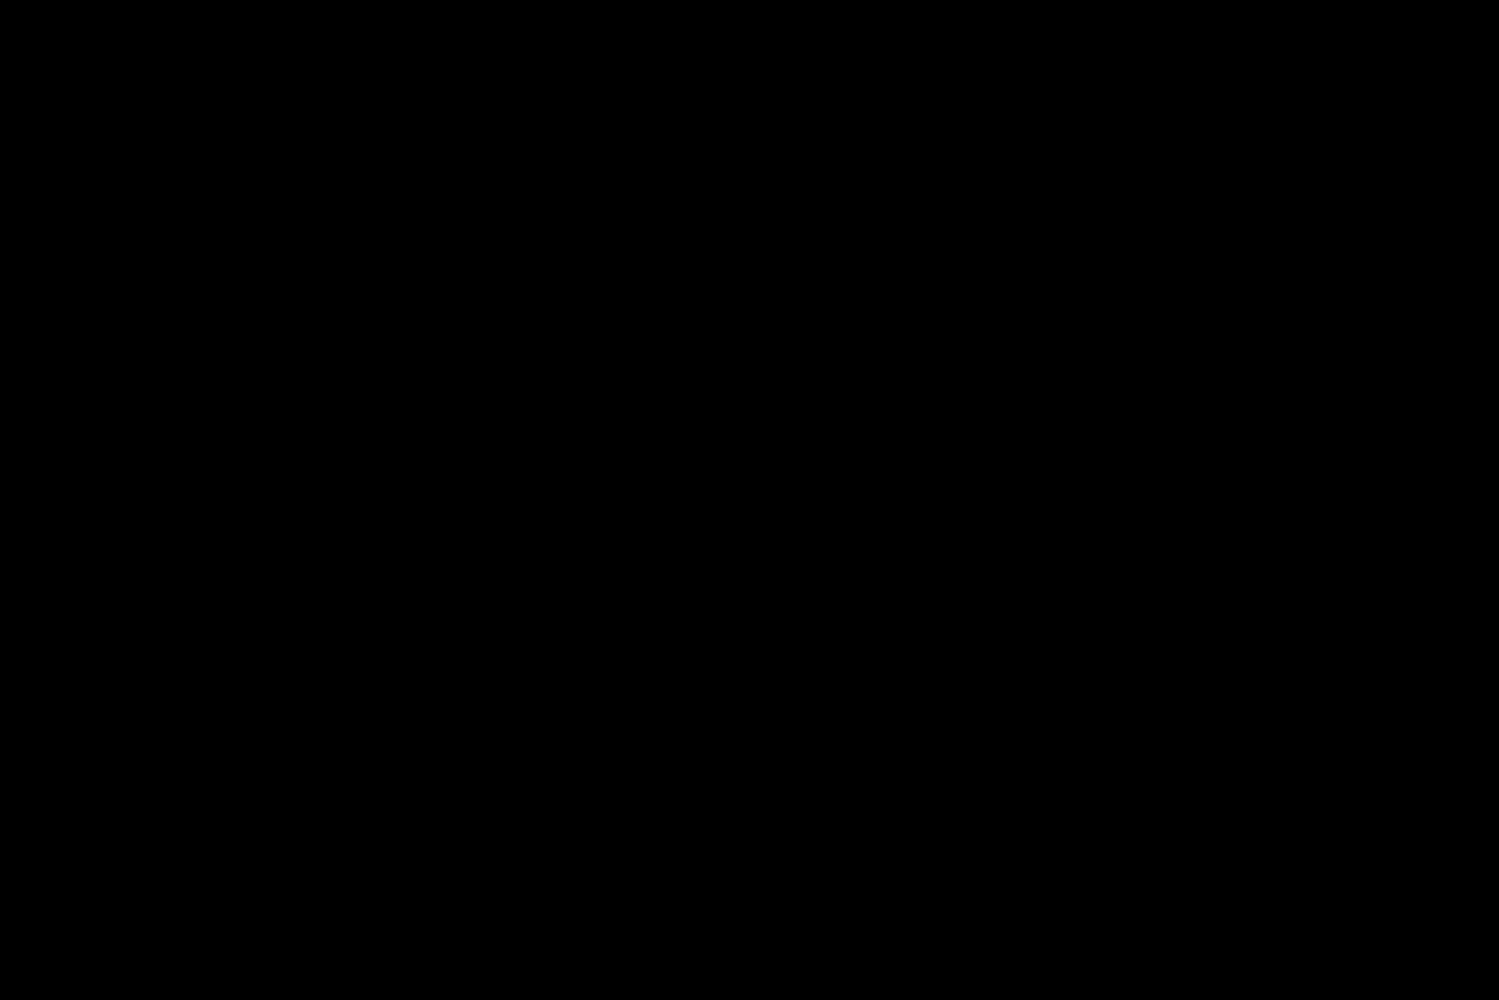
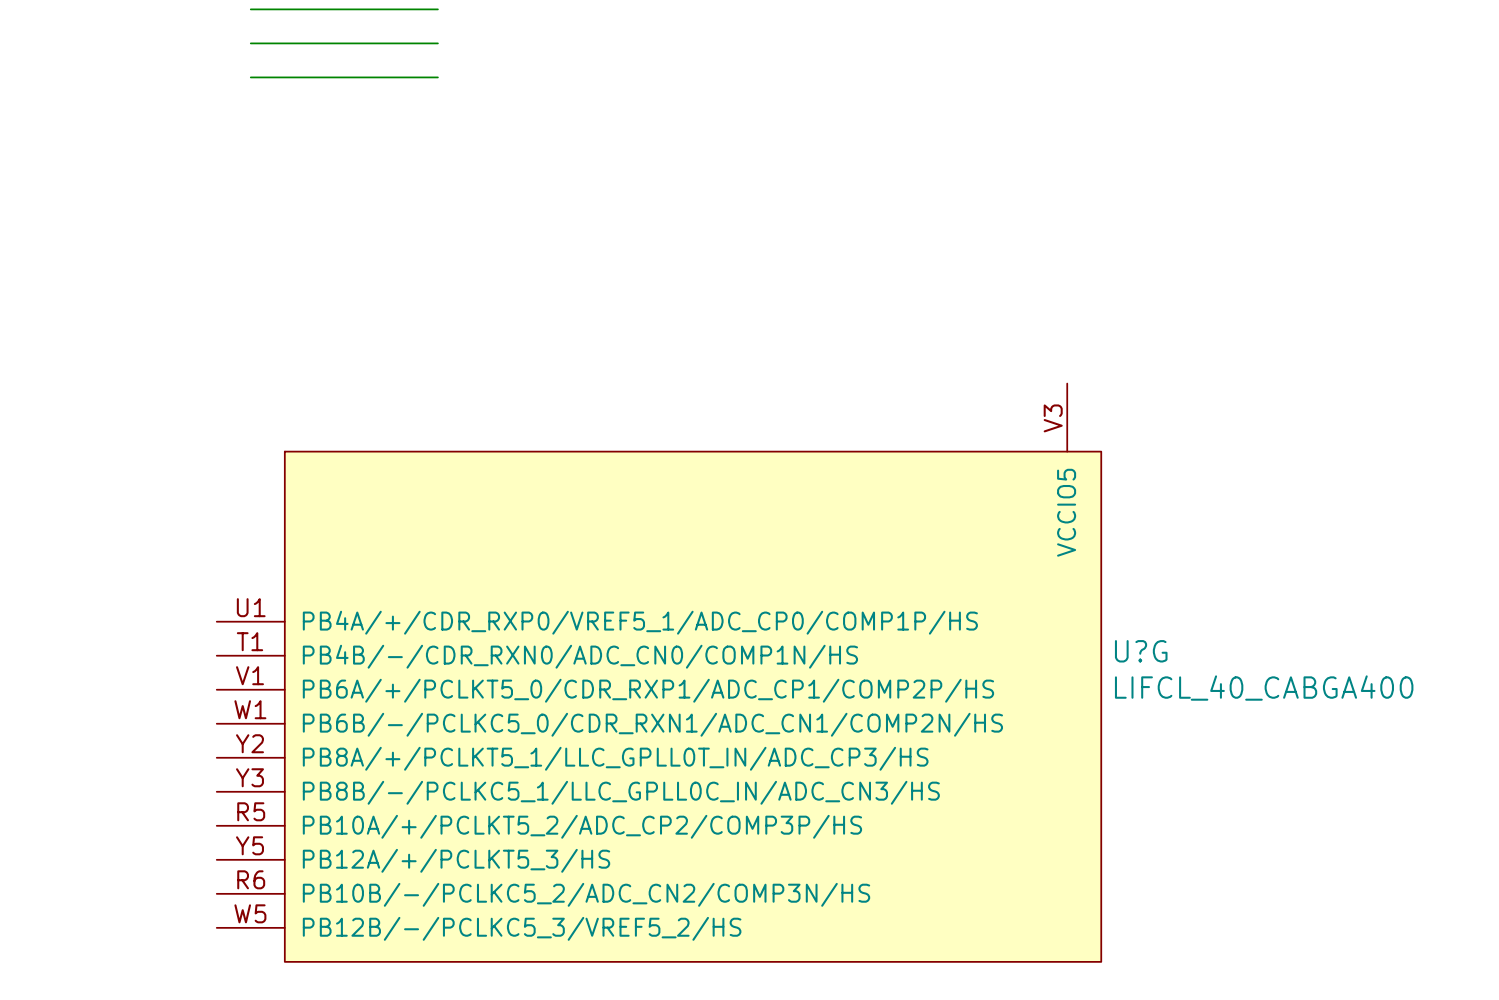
wire: none -> (250, 9) (437, 9)
wire: none -> (250, 43) (437, 43)
wire: none -> (250, 77) (437, 77)
U?G: none -> LIFCL_40_CABGA400 (659, 672)

